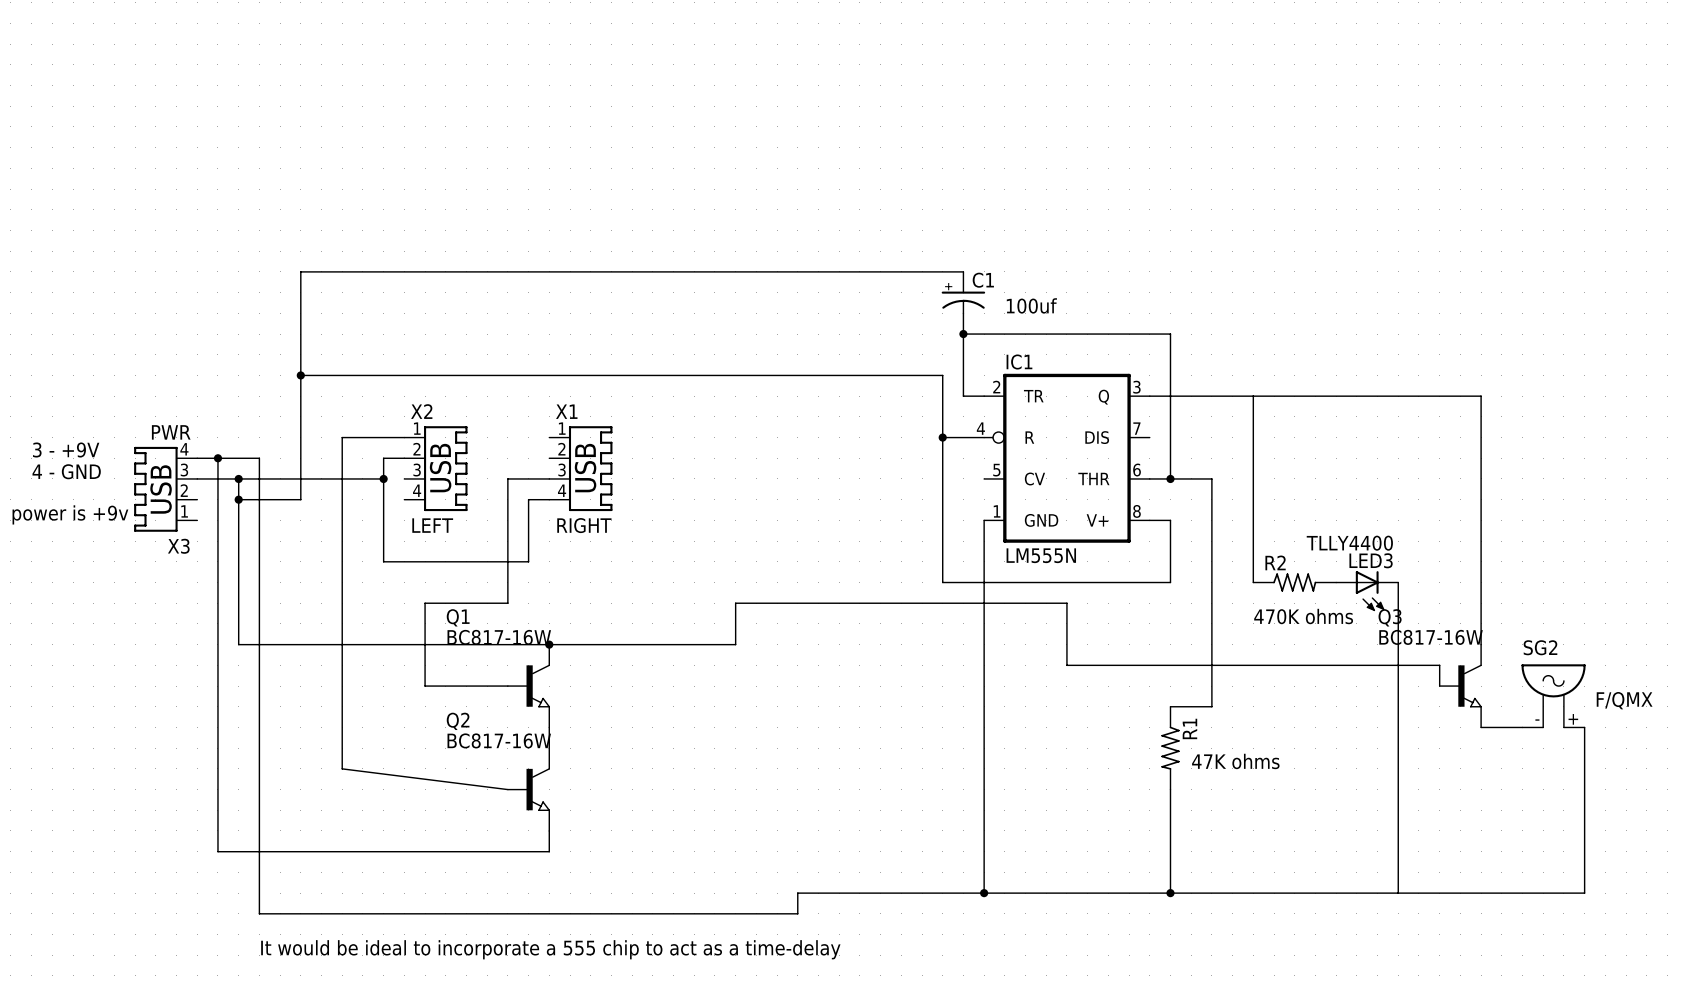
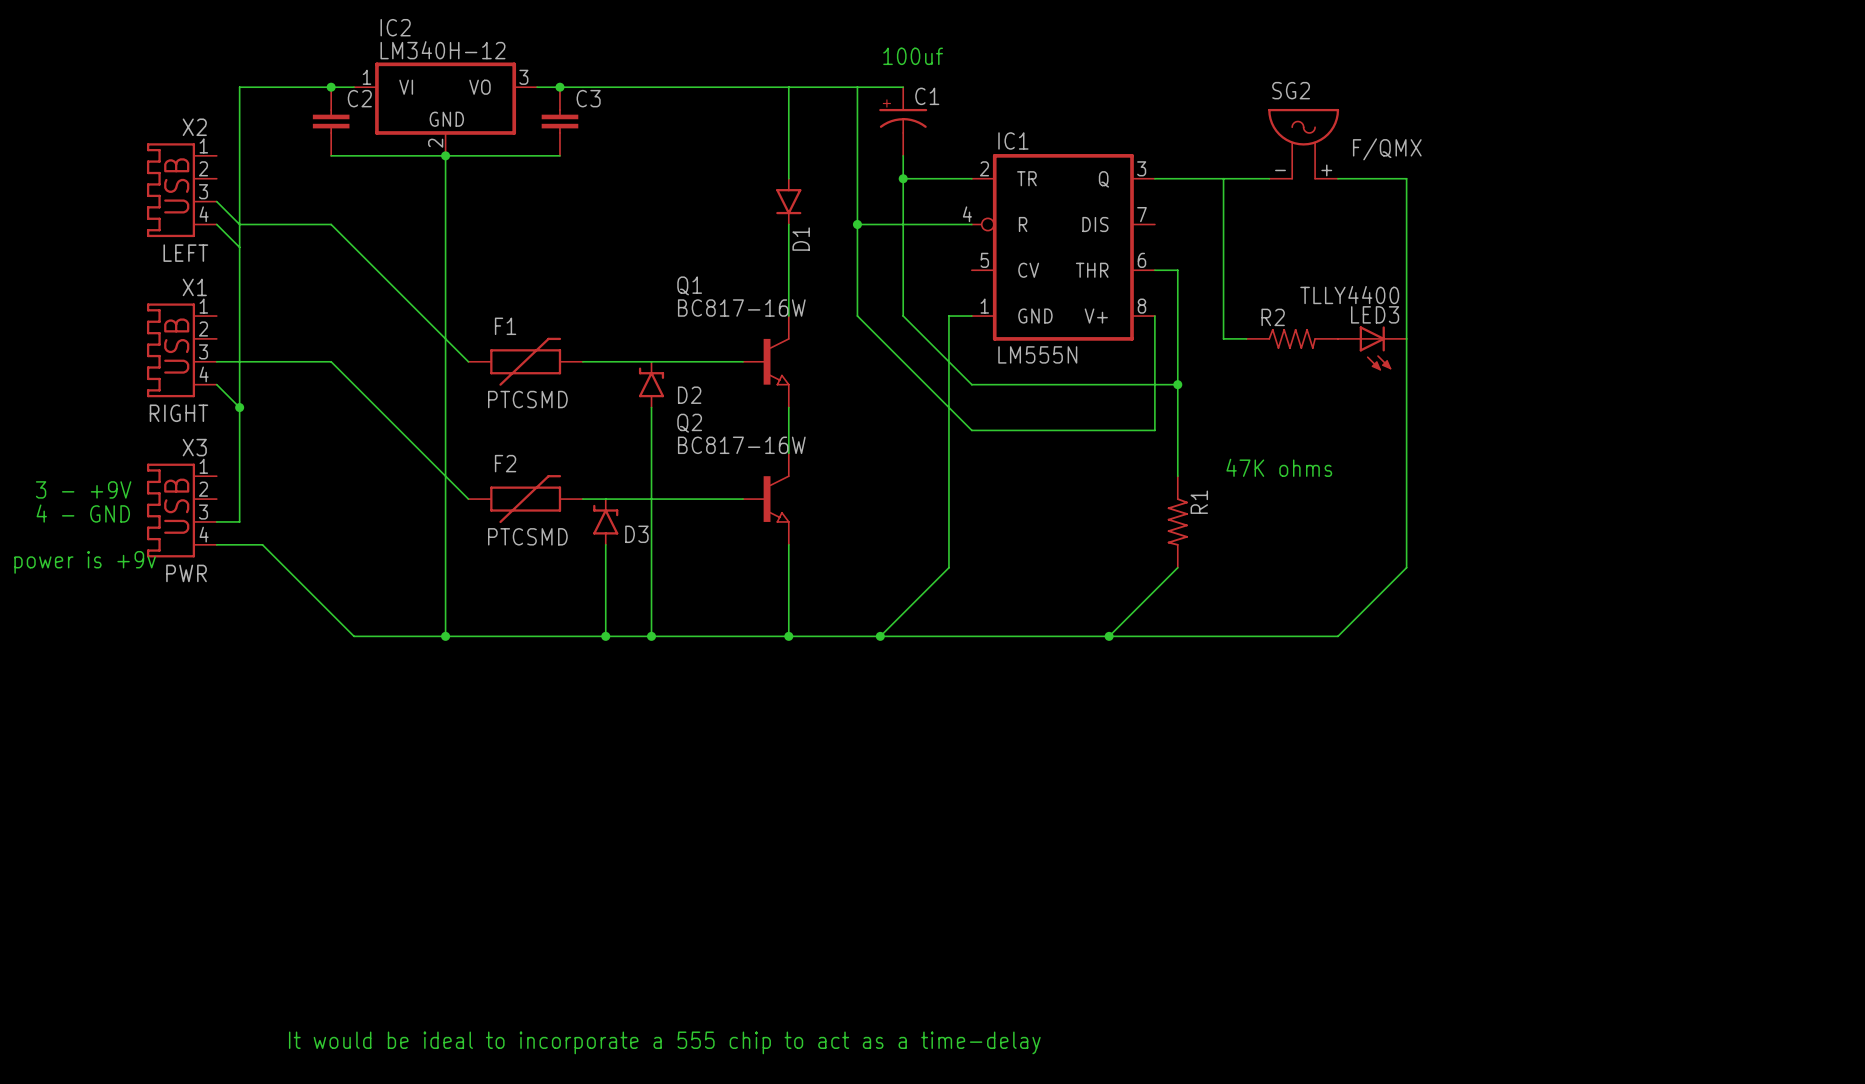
text: none -> 100uf (913, 56)
junction: none -> (331, 87)
wire: none -> (354, 87) (239, 87) (239, 499)
wire: none -> (537, 87) (903, 87)
junction: none -> (559, 87)
wire: none -> (788, 87) (788, 178)
IC2: none -> LM340H-12 (445, 109)
C2: none -> (331, 121)
C3: none -> (559, 121)
wire: none -> (331, 155) (559, 155)
wire: none -> (445, 155) (445, 636)
junction: none -> (445, 155)
wire: none -> (903, 155) (903, 316) (971, 384) (1177, 384)
wire: none -> (903, 178) (971, 178)
junction: none -> (903, 178)
wire: none -> (1154, 178) (1269, 178)
wire: none -> (1223, 178) (1223, 338) (1246, 338)
wire: none -> (216, 201) (239, 224) (331, 224) (468, 361)
D1: none -> (788, 201)
wire: none -> (216, 224) (239, 247)
wire: none -> (788, 224) (788, 316)
wire: none -> (857, 224) (971, 224)
junction: none -> (857, 224)
wire: none -> (1154, 270) (1177, 270) (1177, 476)
wire: (963, 271) (300, 271) (300, 499) (238, 499) -> none
wire: none -> (971, 316) (948, 316) (948, 567) (880, 636)
wire: none -> (1154, 316) (1154, 430) (1086, 430)
C1 position: (963, 302) -> (903, 121)
text: 100uf (1031, 305) -> none
wire: none -> (216, 361) (331, 361) (468, 499)
F1: none -> PTCSMD (525, 361)
wire: none -> (582, 361) (743, 361)
junction: (963, 334) -> none
wire: none -> (216, 384) (239, 407)
D2: none -> (651, 384)
junction: none -> (1177, 384)
junction: none -> (239, 407)
wire: (300, 375) (942, 375) (942, 582) -> (216, 544) (262, 544) (354, 636) (1040, 636)
junction: (300, 375) -> none
wire: none -> (651, 407) (651, 636)
wire: none -> (788, 407) (788, 453)
wire: (963, 396) (963, 334) (1170, 334) (1170, 478) -> (1063, 430) (971, 430) (857, 316) (857, 87)
wire: (1149, 396) (1481, 396) (1481, 644) -> none
wire: (1253, 396) (1253, 582) -> none
X2 name position: X2 (421, 411) -> X2 (194, 127)
X1 name position: X1 (566, 411) -> X1 (194, 287)
X2 symbol: [404, 426, 468, 512] -> [146, 143, 217, 238]
X1 symbol: [549, 426, 613, 512] -> [146, 303, 217, 398]
text: none -> 47K ohms (1279, 467)
wire: (404, 437) (342, 437) (342, 768) (507, 789) -> none
wire: (942, 437) (984, 437) -> none
junction: (942, 437) -> none
wire: (197, 458) (259, 458) (259, 913) (797, 913) (797, 893) (1584, 893) (1584, 727) -> none
junction: (217, 458) -> none
wire: (404, 458) (383, 458) (383, 561) (528, 561) (528, 499) (549, 499) -> (605, 636) (605, 544)
F2: none -> PTCSMD (525, 499)
wire: none -> (582, 499) (743, 499)
IC1 position: (1066, 458) -> (1063, 247)
wire: (238, 478) (238, 644) (735, 644) (735, 603) (1066, 603) (1066, 665) (1439, 665) (1439, 686) -> none
junction: (238, 478) -> none
wire: (383, 478) (217, 478) (217, 851) (549, 851) (549, 830) -> none
junction: (383, 478) -> none
wire: (549, 478) (507, 478) (507, 603) (425, 603) (425, 686) (507, 686) -> none
D3: none -> (605, 521)
wire: (1149, 478) (1211, 478) (1211, 706) (1170, 706) -> none
junction: (1170, 478) -> none
X3 flip: as is (155, 489) -> up-down (170, 510)
junction: (238, 499) -> none
wire: none -> (788, 544) (788, 636)
wire: (984, 520) (984, 893) -> none
wire: none -> (1177, 567) (1109, 636)
wire: (1149, 520) (1170, 520) (1170, 582) -> (1337, 178) (1406, 178) (1406, 567) (1337, 636) (1292, 636)
X1 value position: RIGHT (584, 525) -> RIGHT (178, 413)
R2 symbol: [1253, 573, 1337, 592] -> [1246, 329, 1338, 349]
junction: none -> (445, 636)
junction: none -> (605, 636)
junction: none -> (651, 636)
junction: none -> (788, 636)
junction: none -> (880, 636)
junction: none -> (1109, 636)
wire: (1398, 582) (1398, 893) -> none
LED3 position: (1367, 591) -> (1372, 348)
text: 470K ohms (1303, 616) -> none
junction: (549, 644) -> none
Q1 position: (528, 686) -> (766, 361)
Q3: BC817-16W (1460, 686) -> none
SG2 position: (1553, 696) -> (1303, 144)
wire: (549, 727) (549, 748) -> none
wire: (1481, 727) (1522, 727) -> none
R1 position: (1170, 748) -> (1177, 521)
text: 47K ohms (1235, 761) -> none
Q2 position: (528, 789) -> (766, 499)
wire: (1170, 789) (1170, 893) -> none
junction: (984, 893) -> none
junction: (1170, 893) -> none

